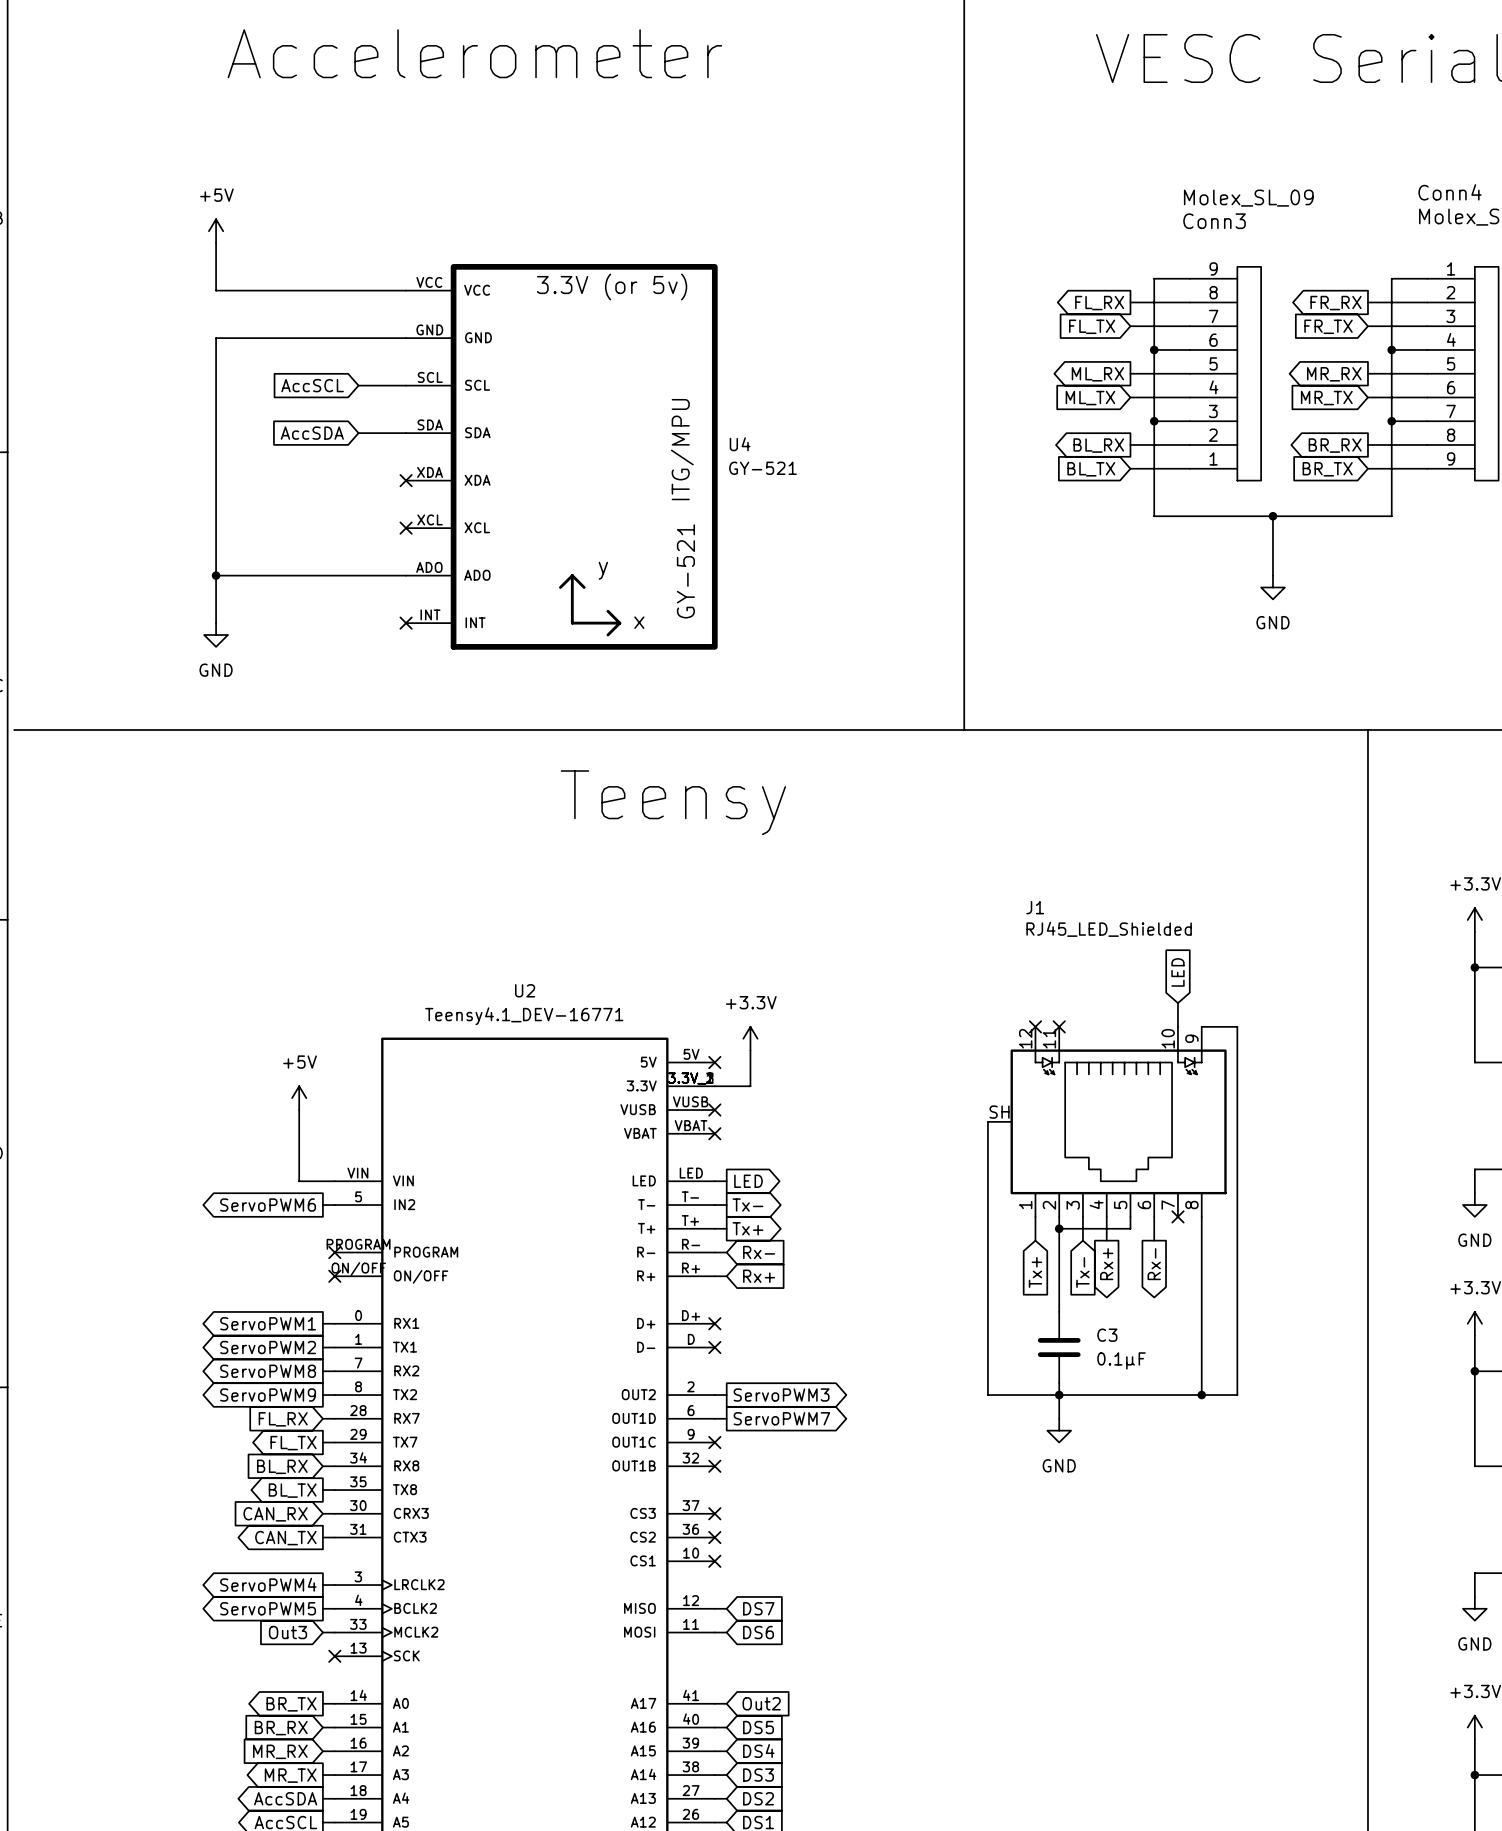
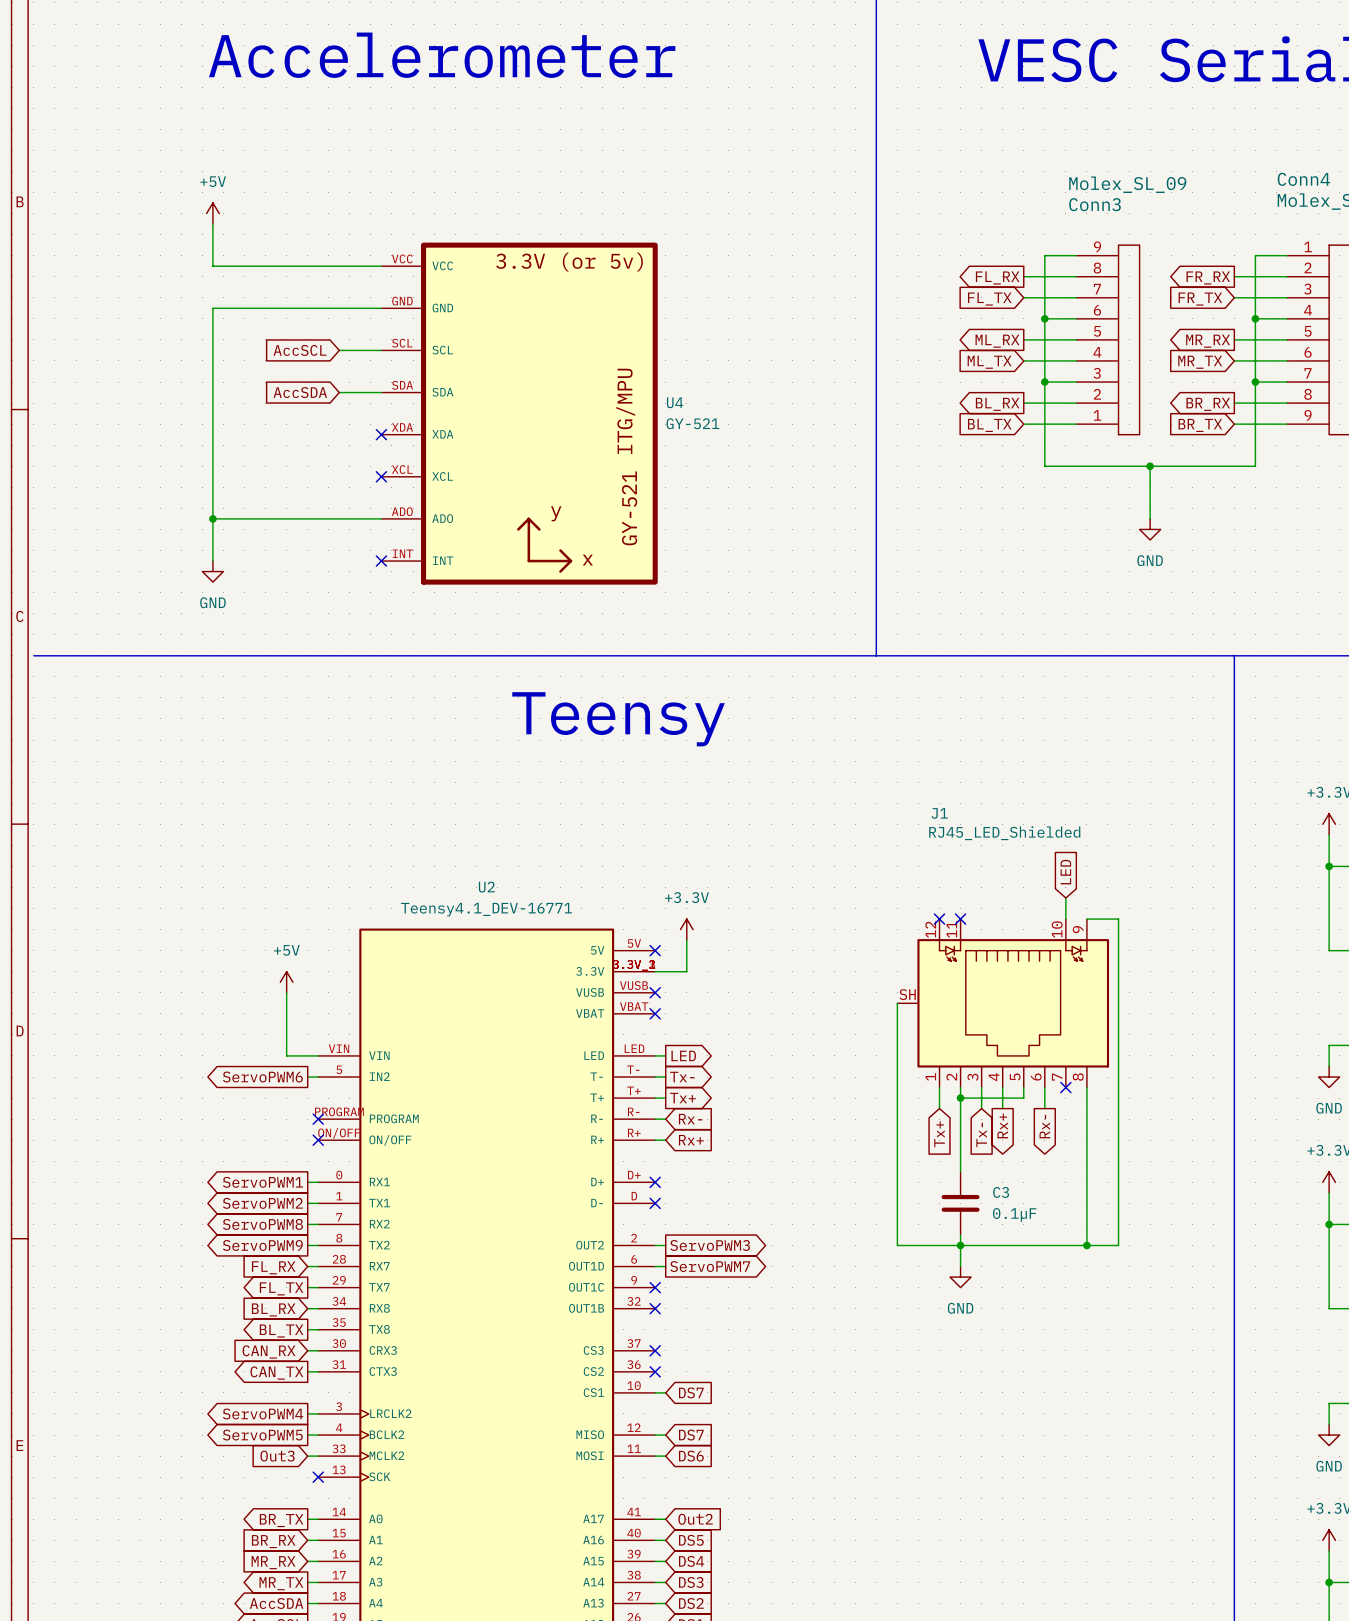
wire: none -> (655, 1392) (665, 1392)
no-connect mark: (714, 1561) -> none
global label: none -> DS7 (691, 1392)

